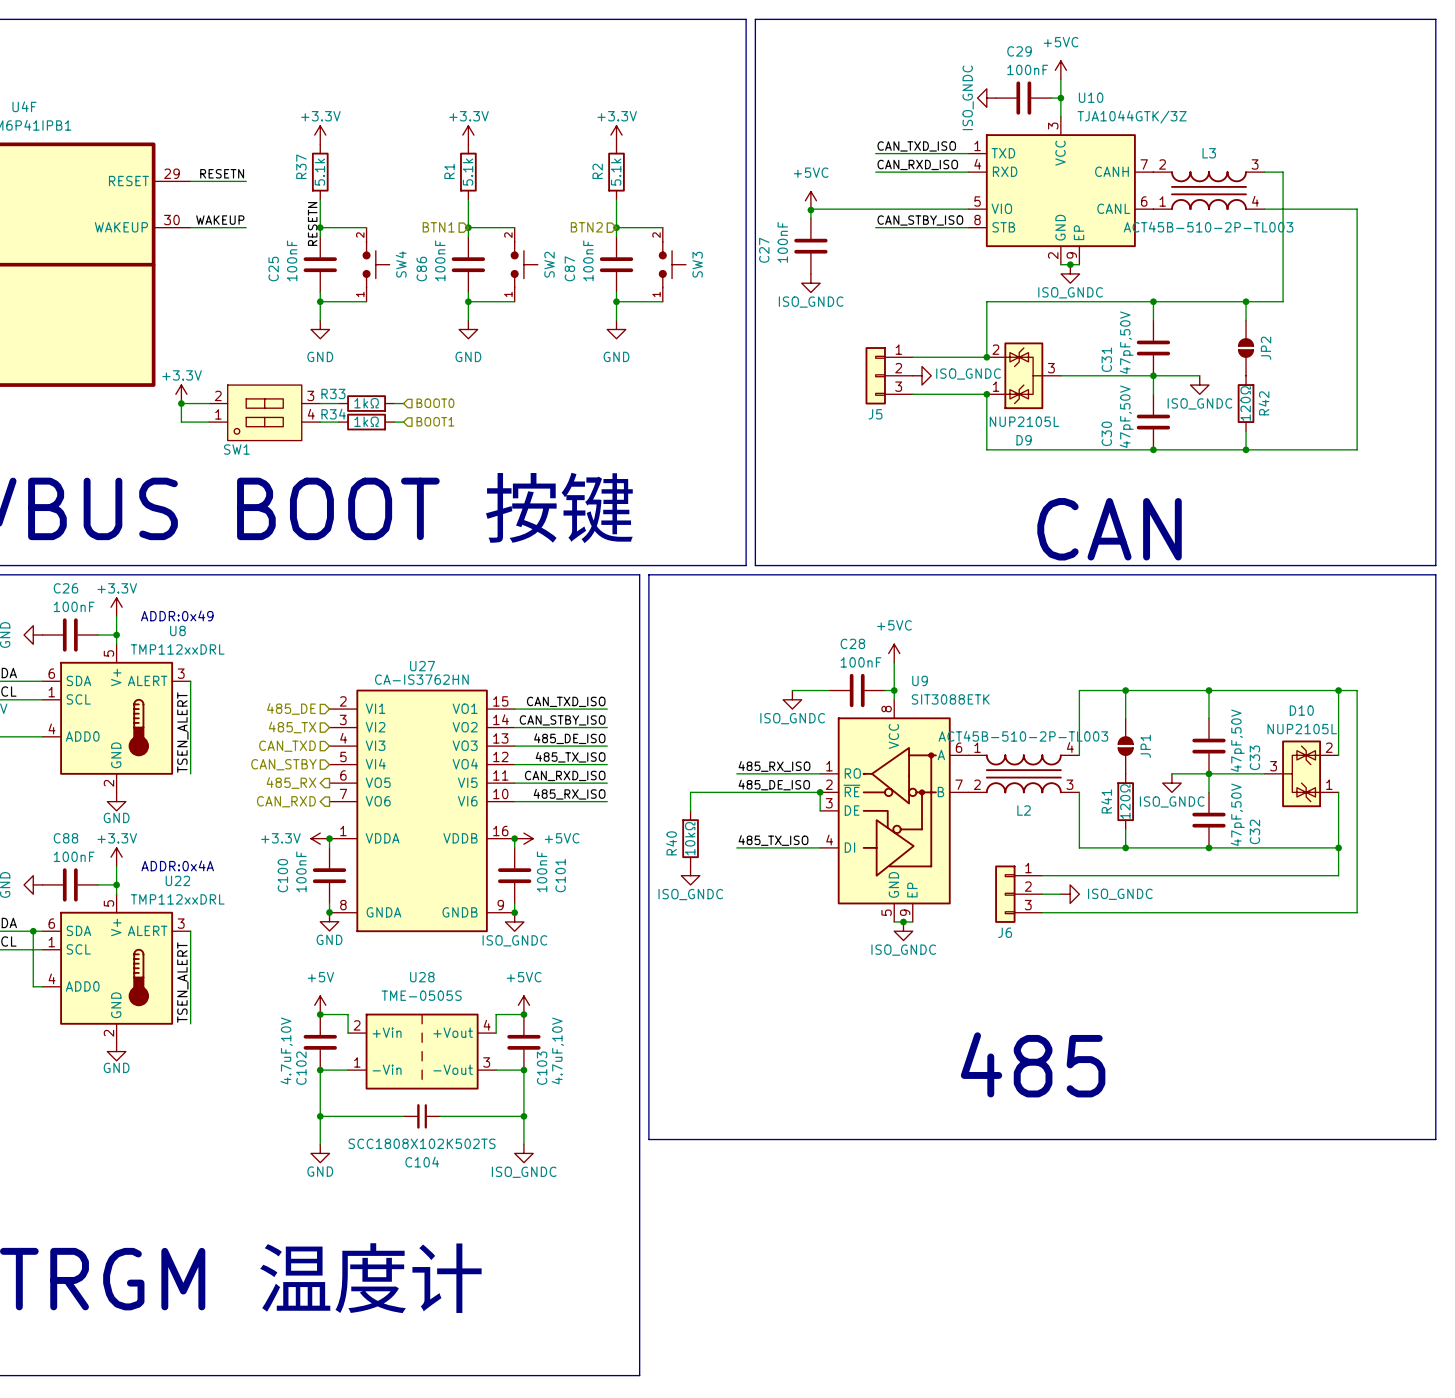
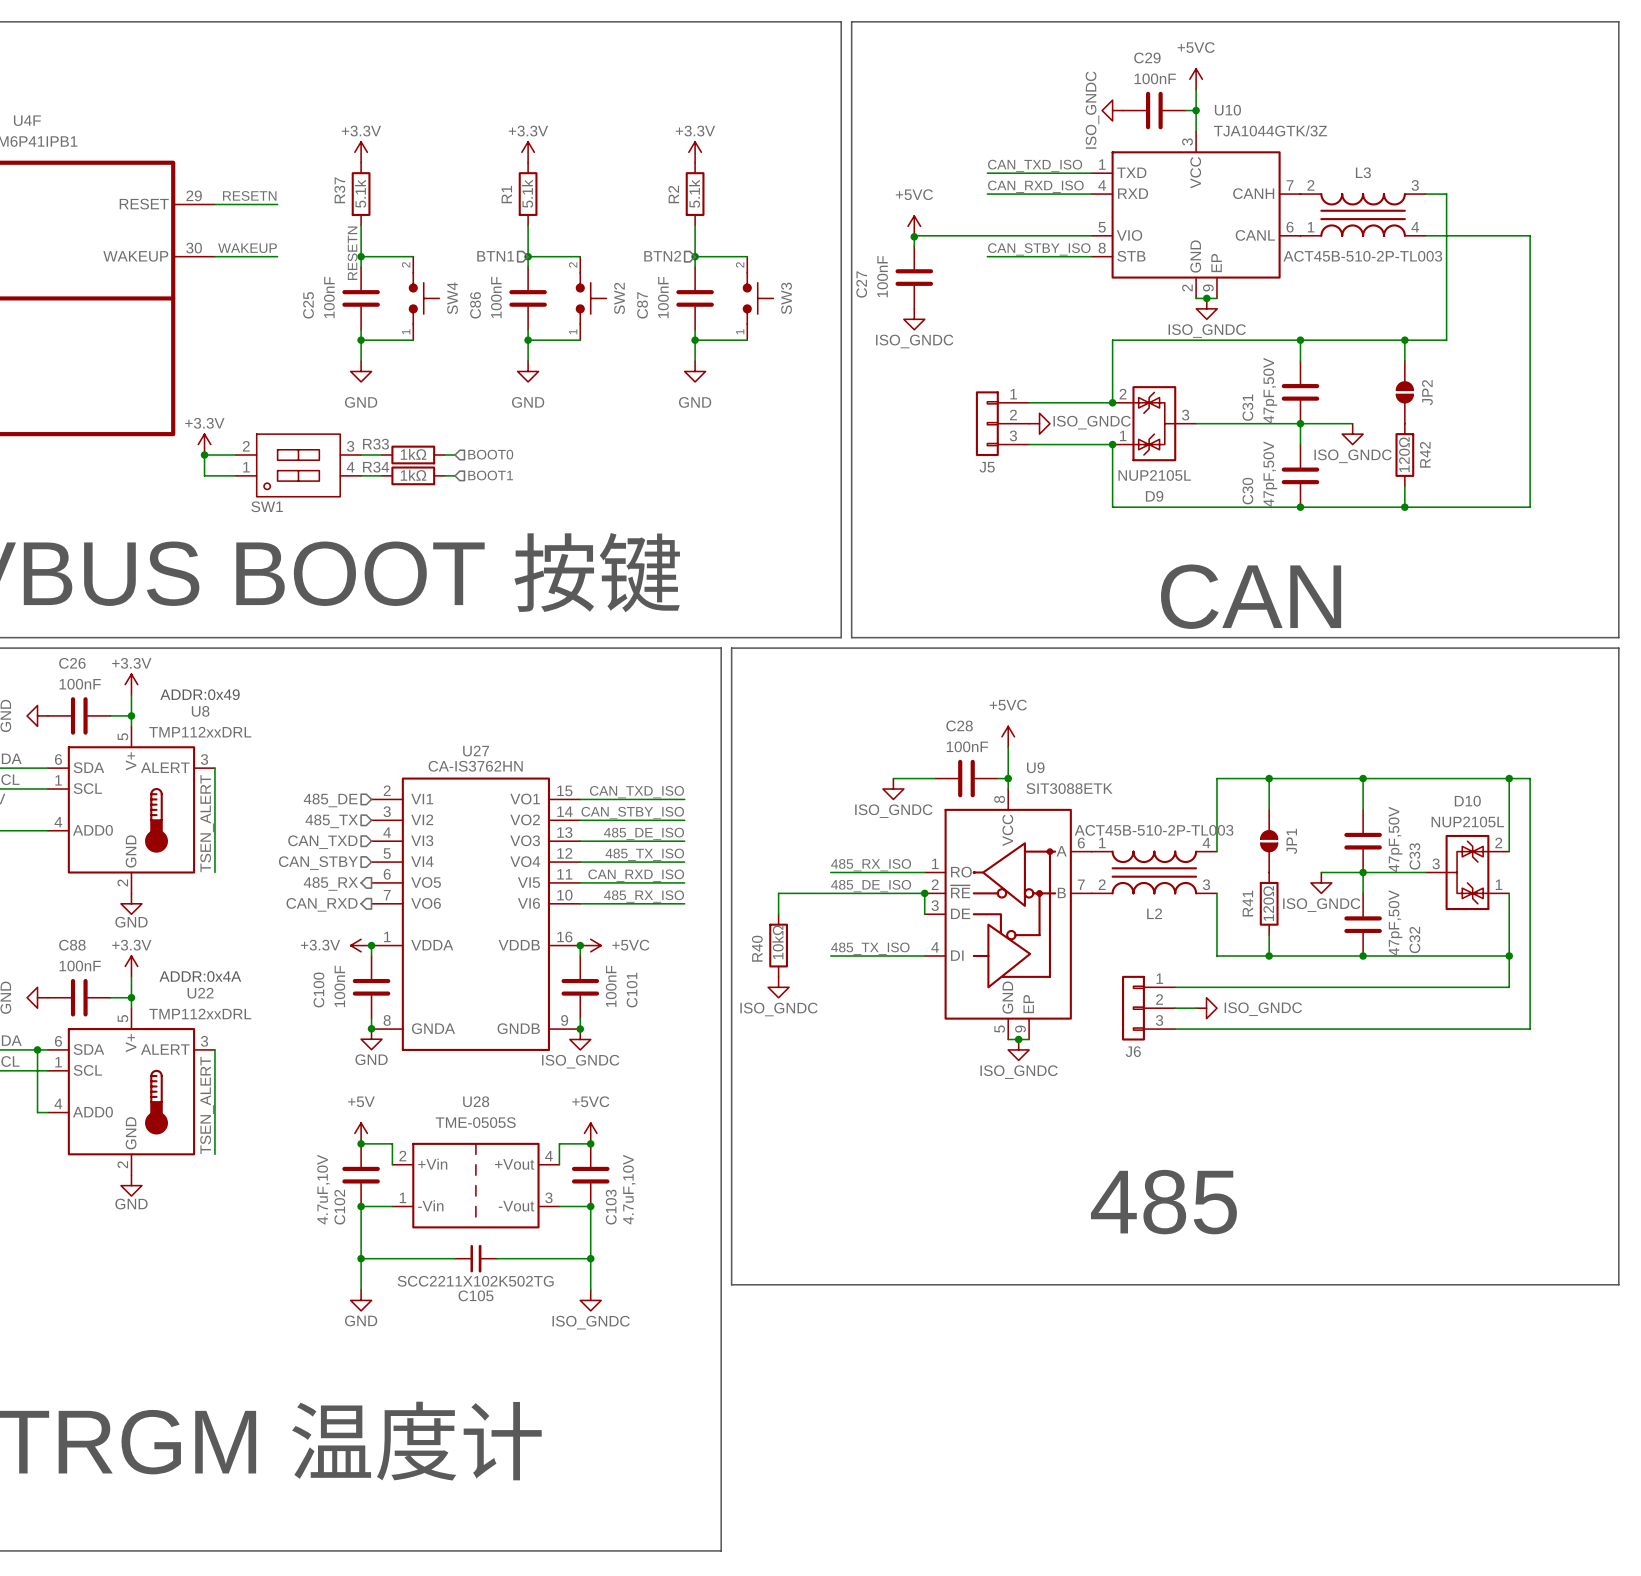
C104: SCC1808X102K502TS (422, 1116) -> none
C105: none -> SCC2211X102K502TG (475, 1258)

